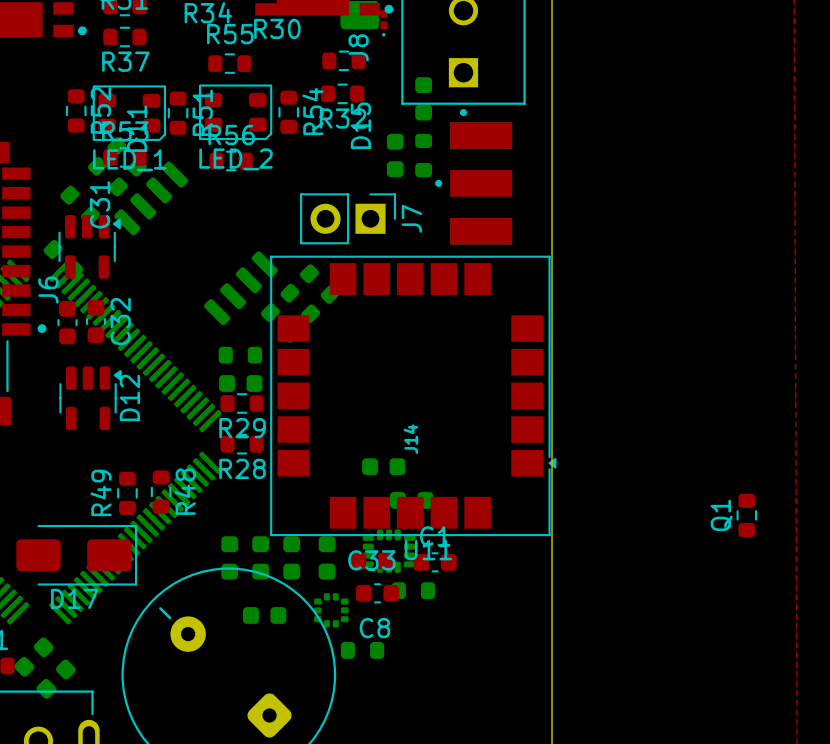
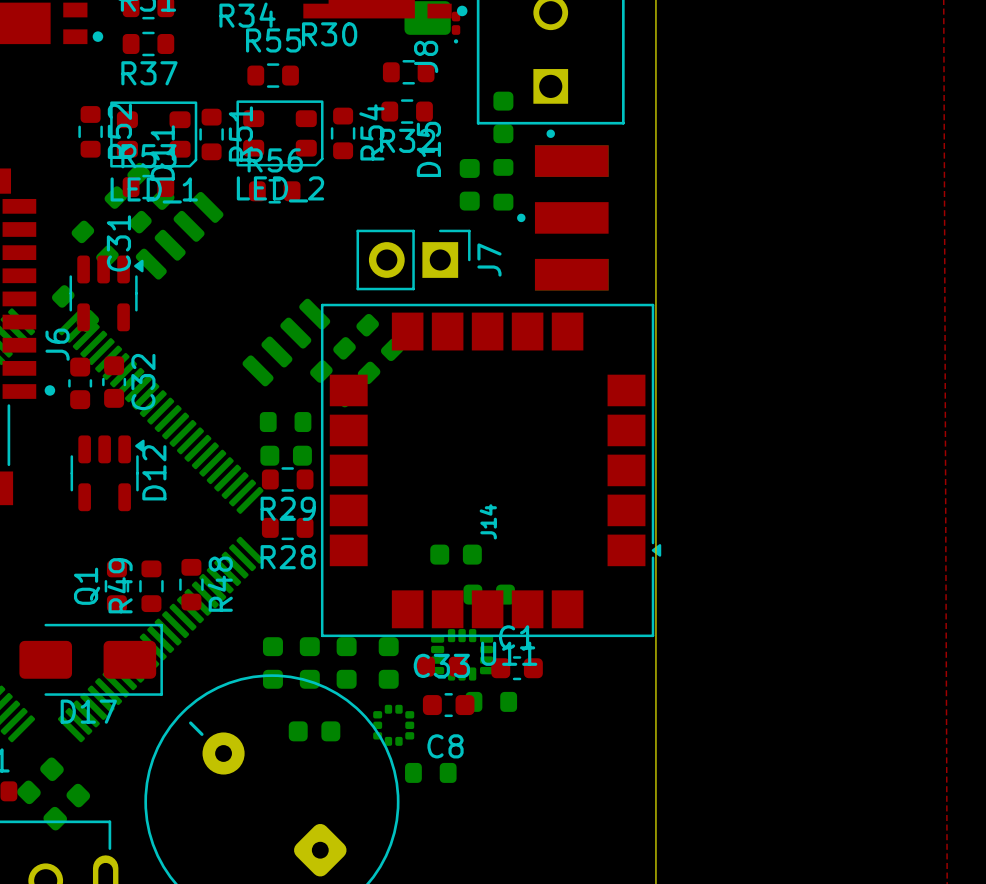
Q1 position: (746, 515) -> (116, 586)

